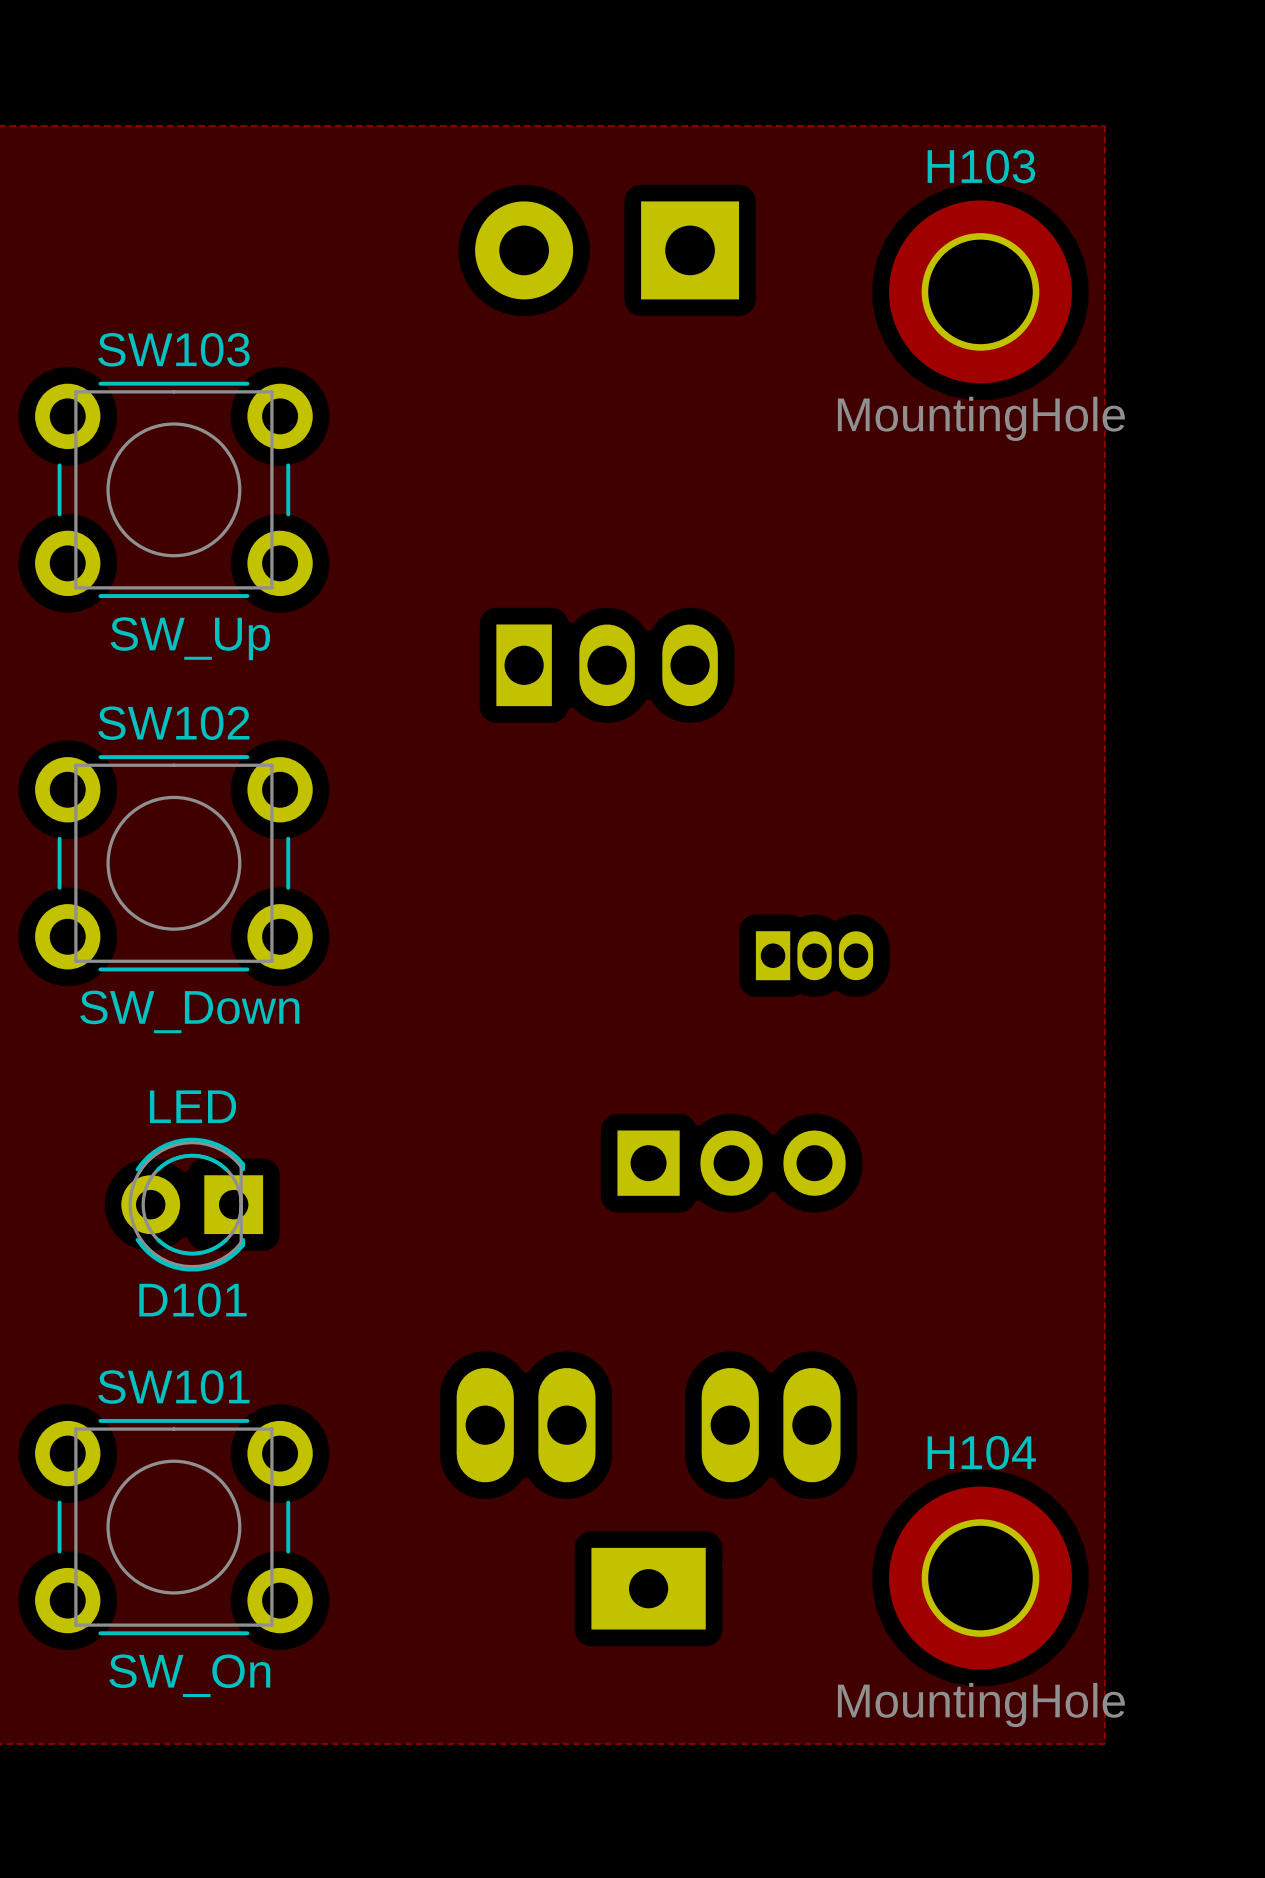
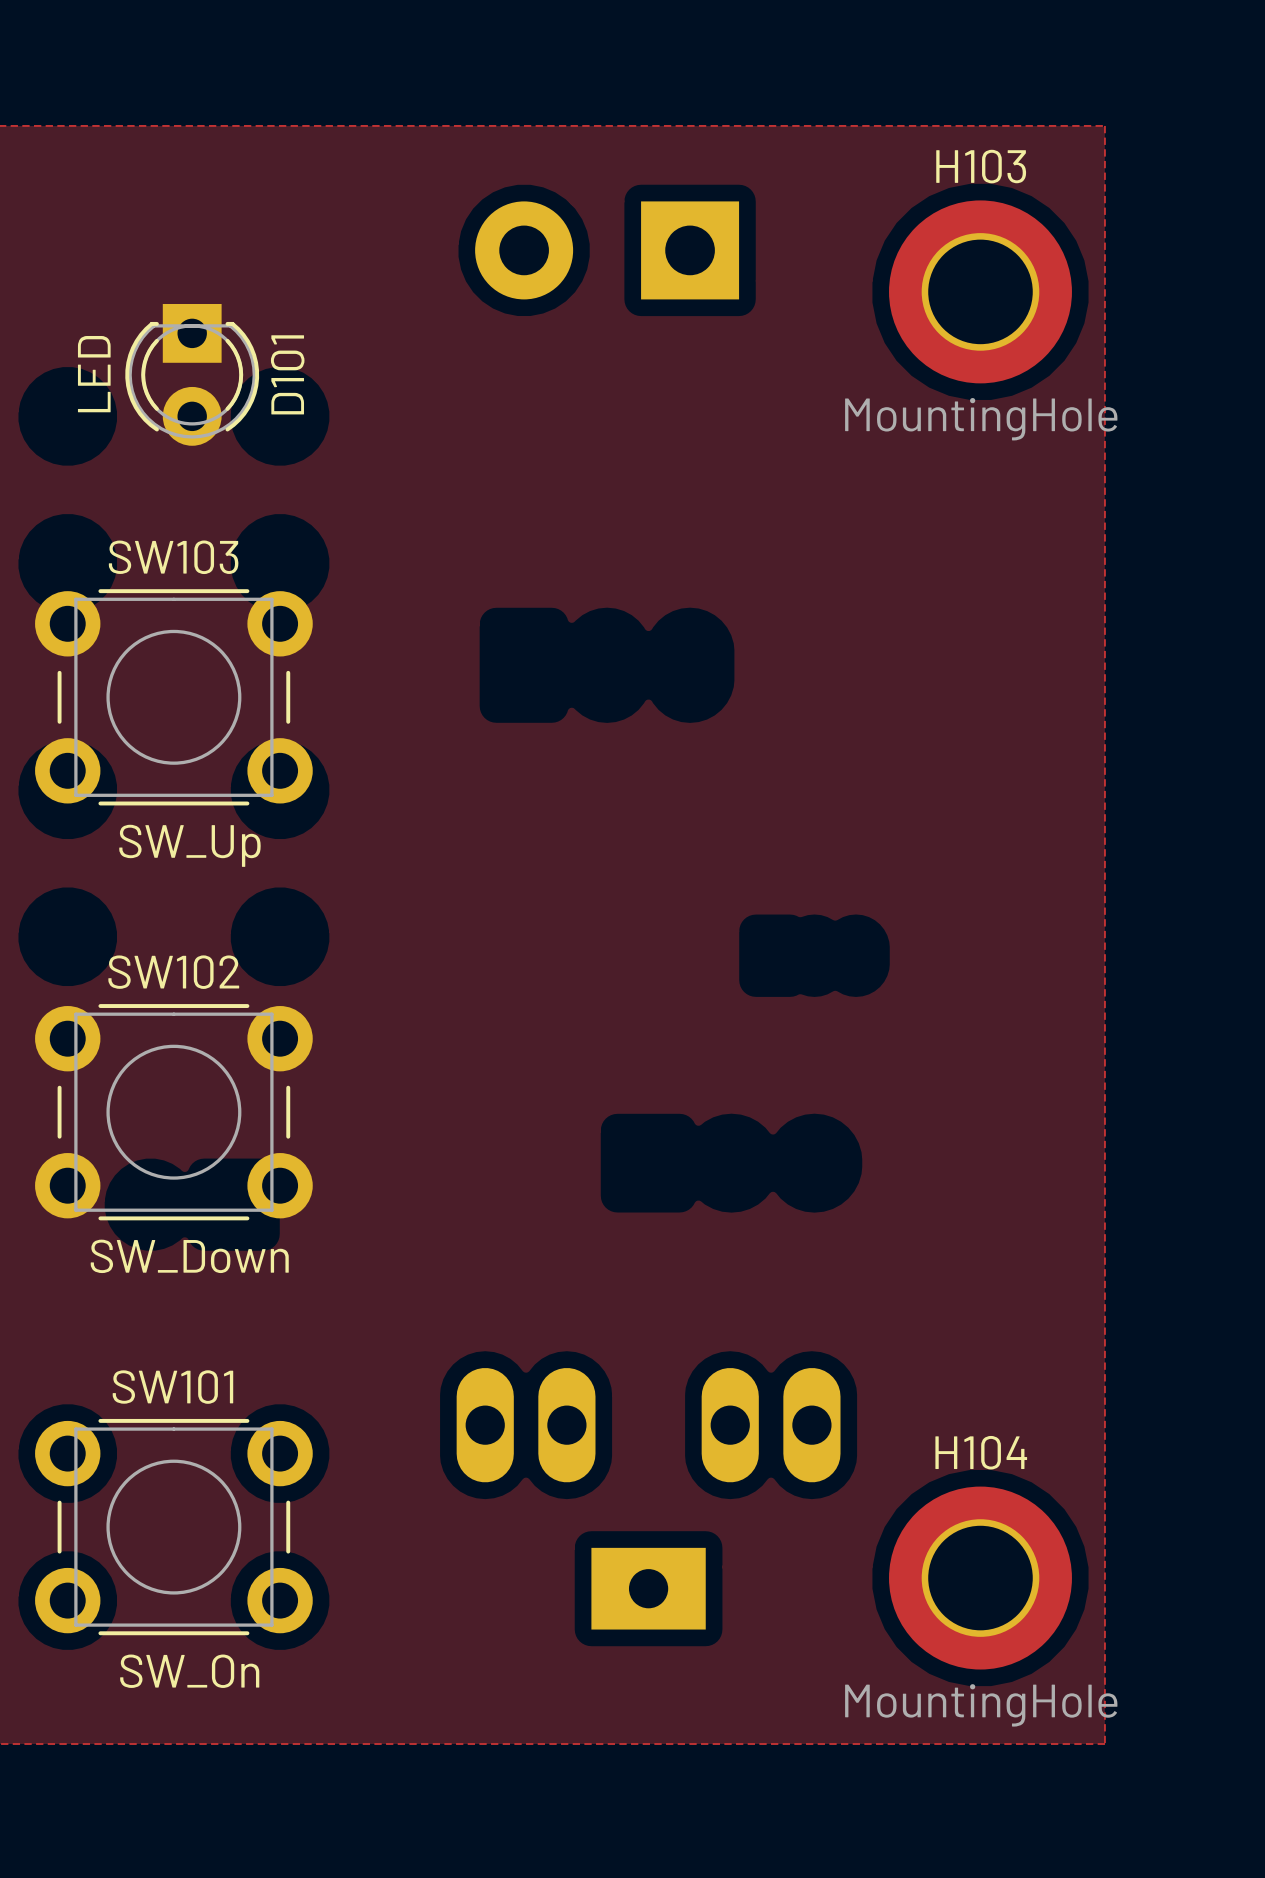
SW103 position: (173, 489) -> (173, 697)
part: (607, 665) -> none
SW102 position: (173, 863) -> (173, 1112)
part: (814, 955) -> none
part: (731, 1163) -> none
D101 rotation: 0° (192, 1204) -> 90° counterclockwise (192, 374)
D101 position: (192, 1204) -> (192, 374)

